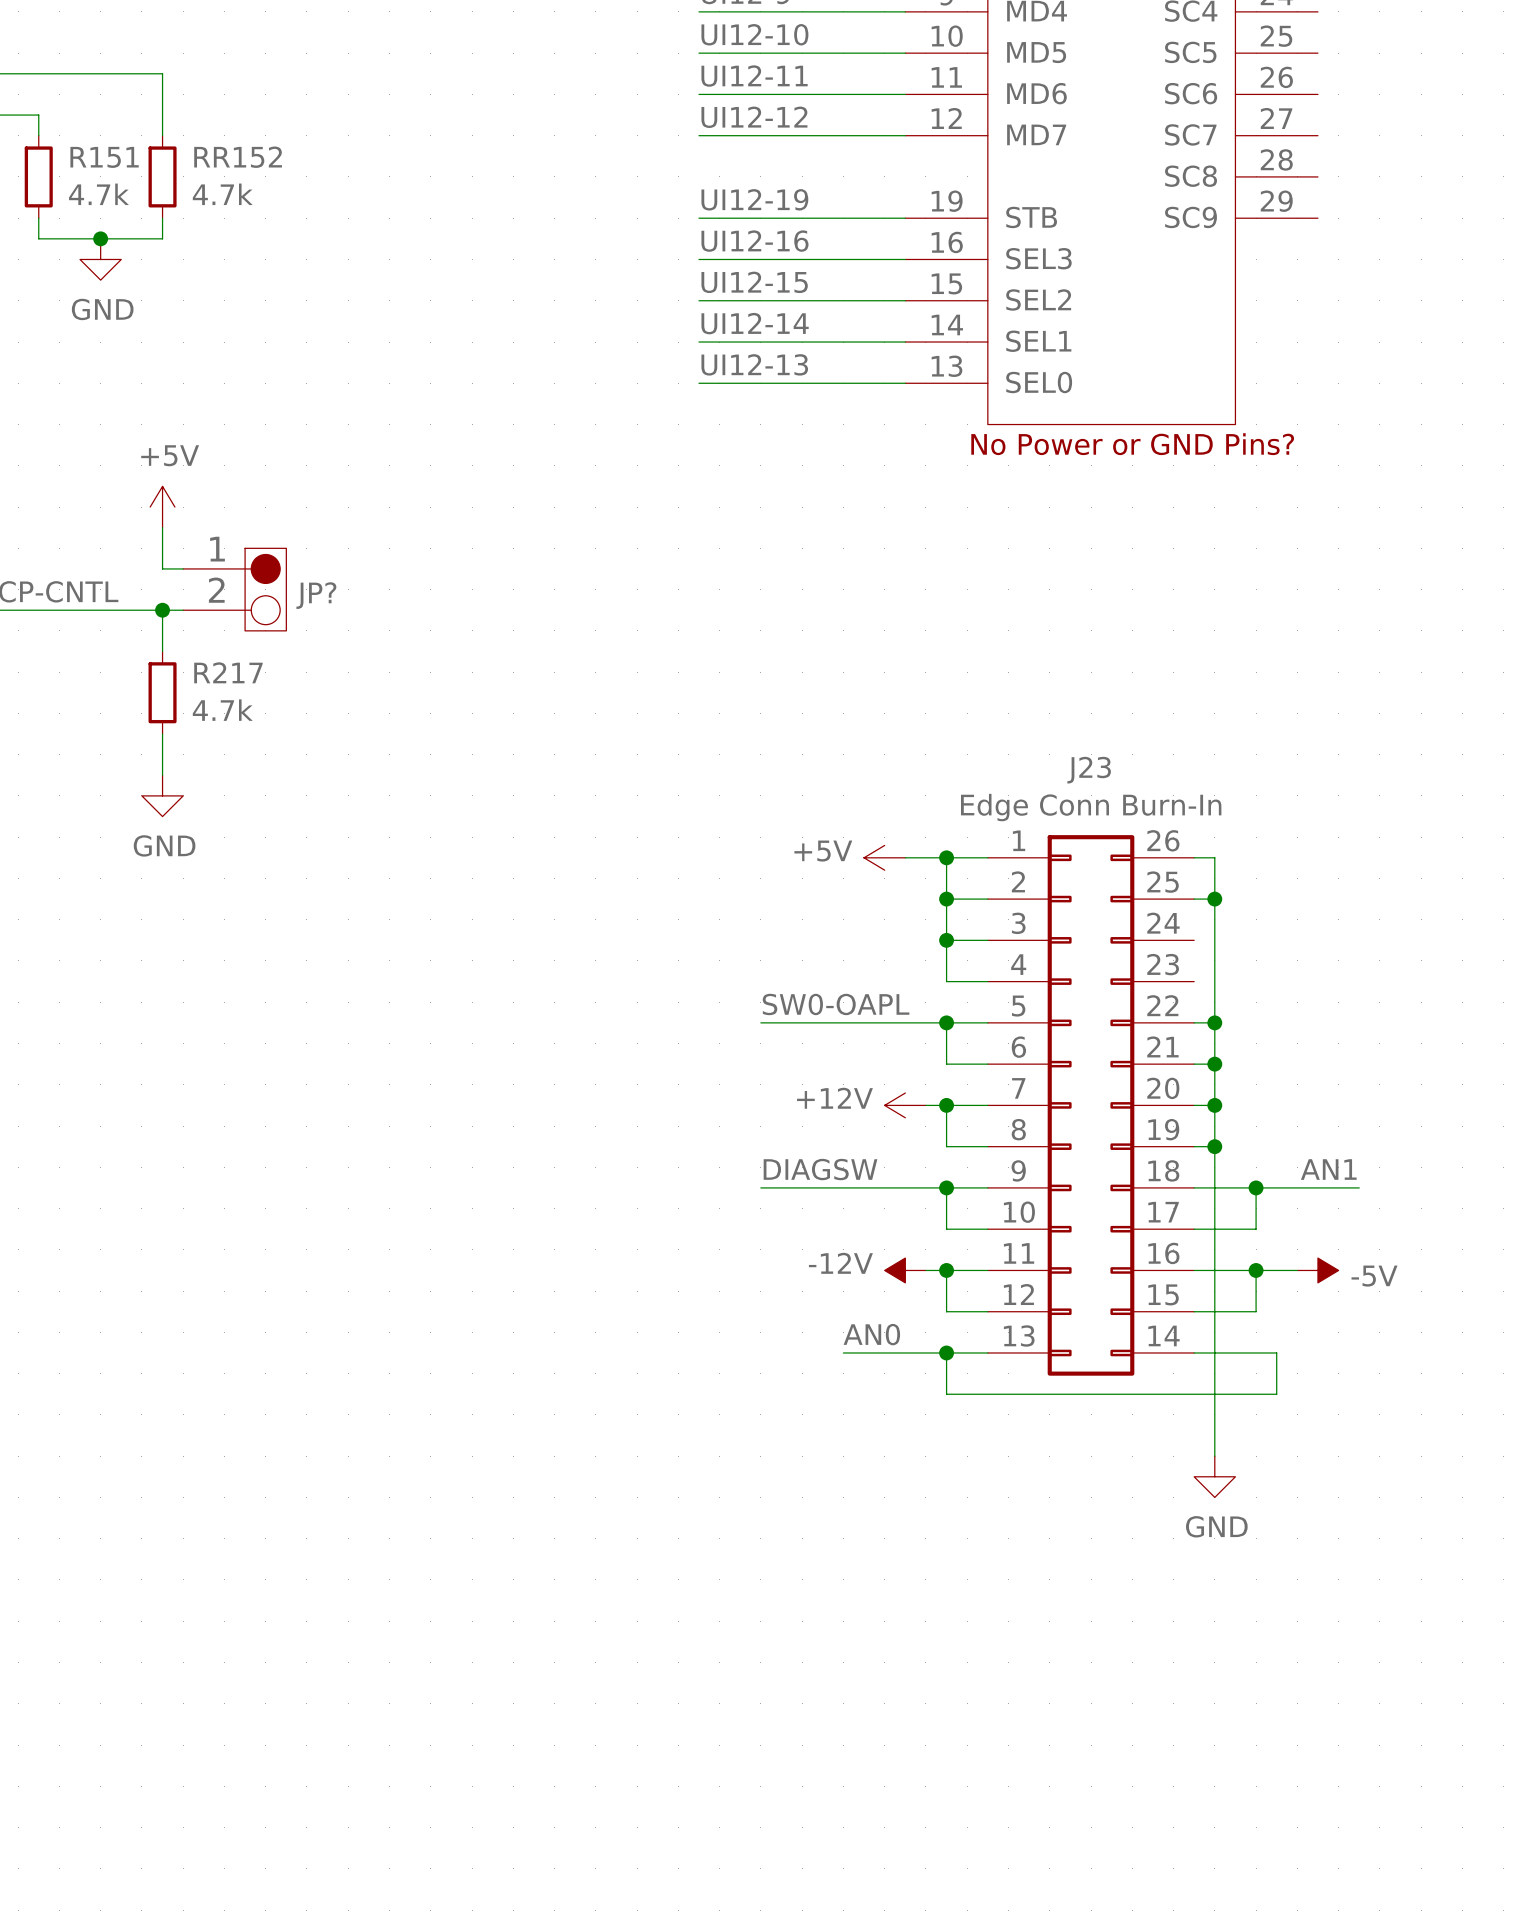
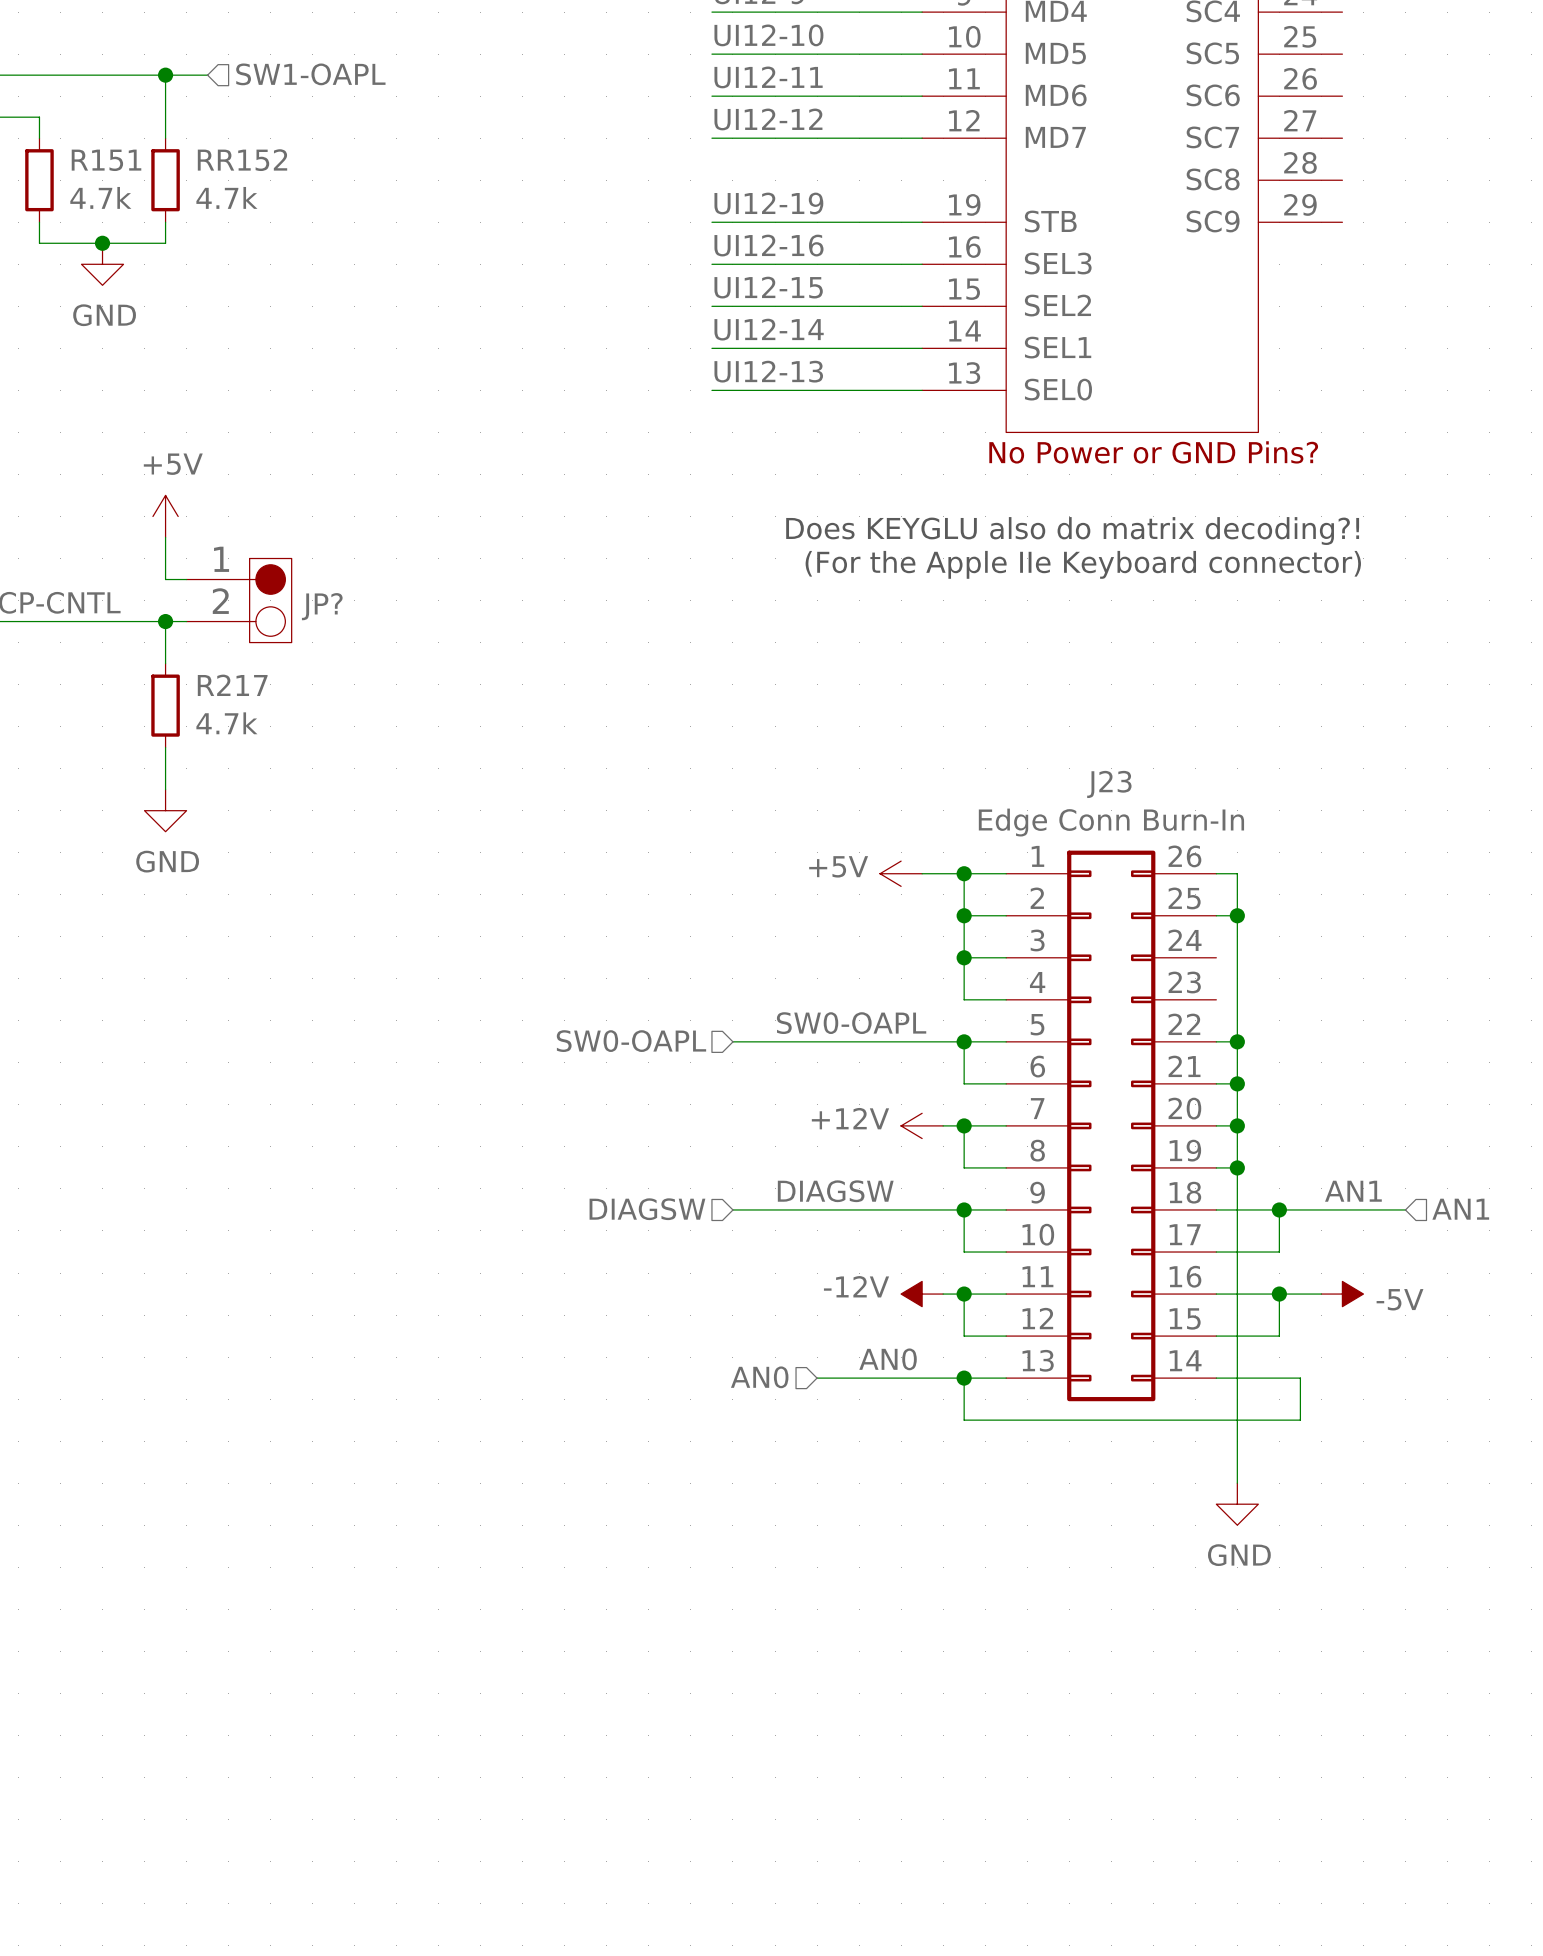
wire: none -> (165, 75) (207, 75)
junction: none -> (165, 75)
hierarchical label: none -> SW1-OAPL (310, 74)
text: none -> Does KEYGLU also do matrix decoding?! (1072, 531)
text: none -> (For the Apple IIe Keyboard connector) (1083, 564)
hierarchical label: none -> SW0-OAPL (631, 1041)
wire: none -> (732, 1041) (775, 1041)
hierarchical label: none -> DIAGSW (647, 1209)
wire: none -> (732, 1209) (775, 1209)
wire: none -> (1384, 1209) (1405, 1209)
hierarchical label: none -> AN1 (1460, 1209)
hierarchical label: none -> AN0 (759, 1377)
wire: none -> (817, 1378) (859, 1378)

